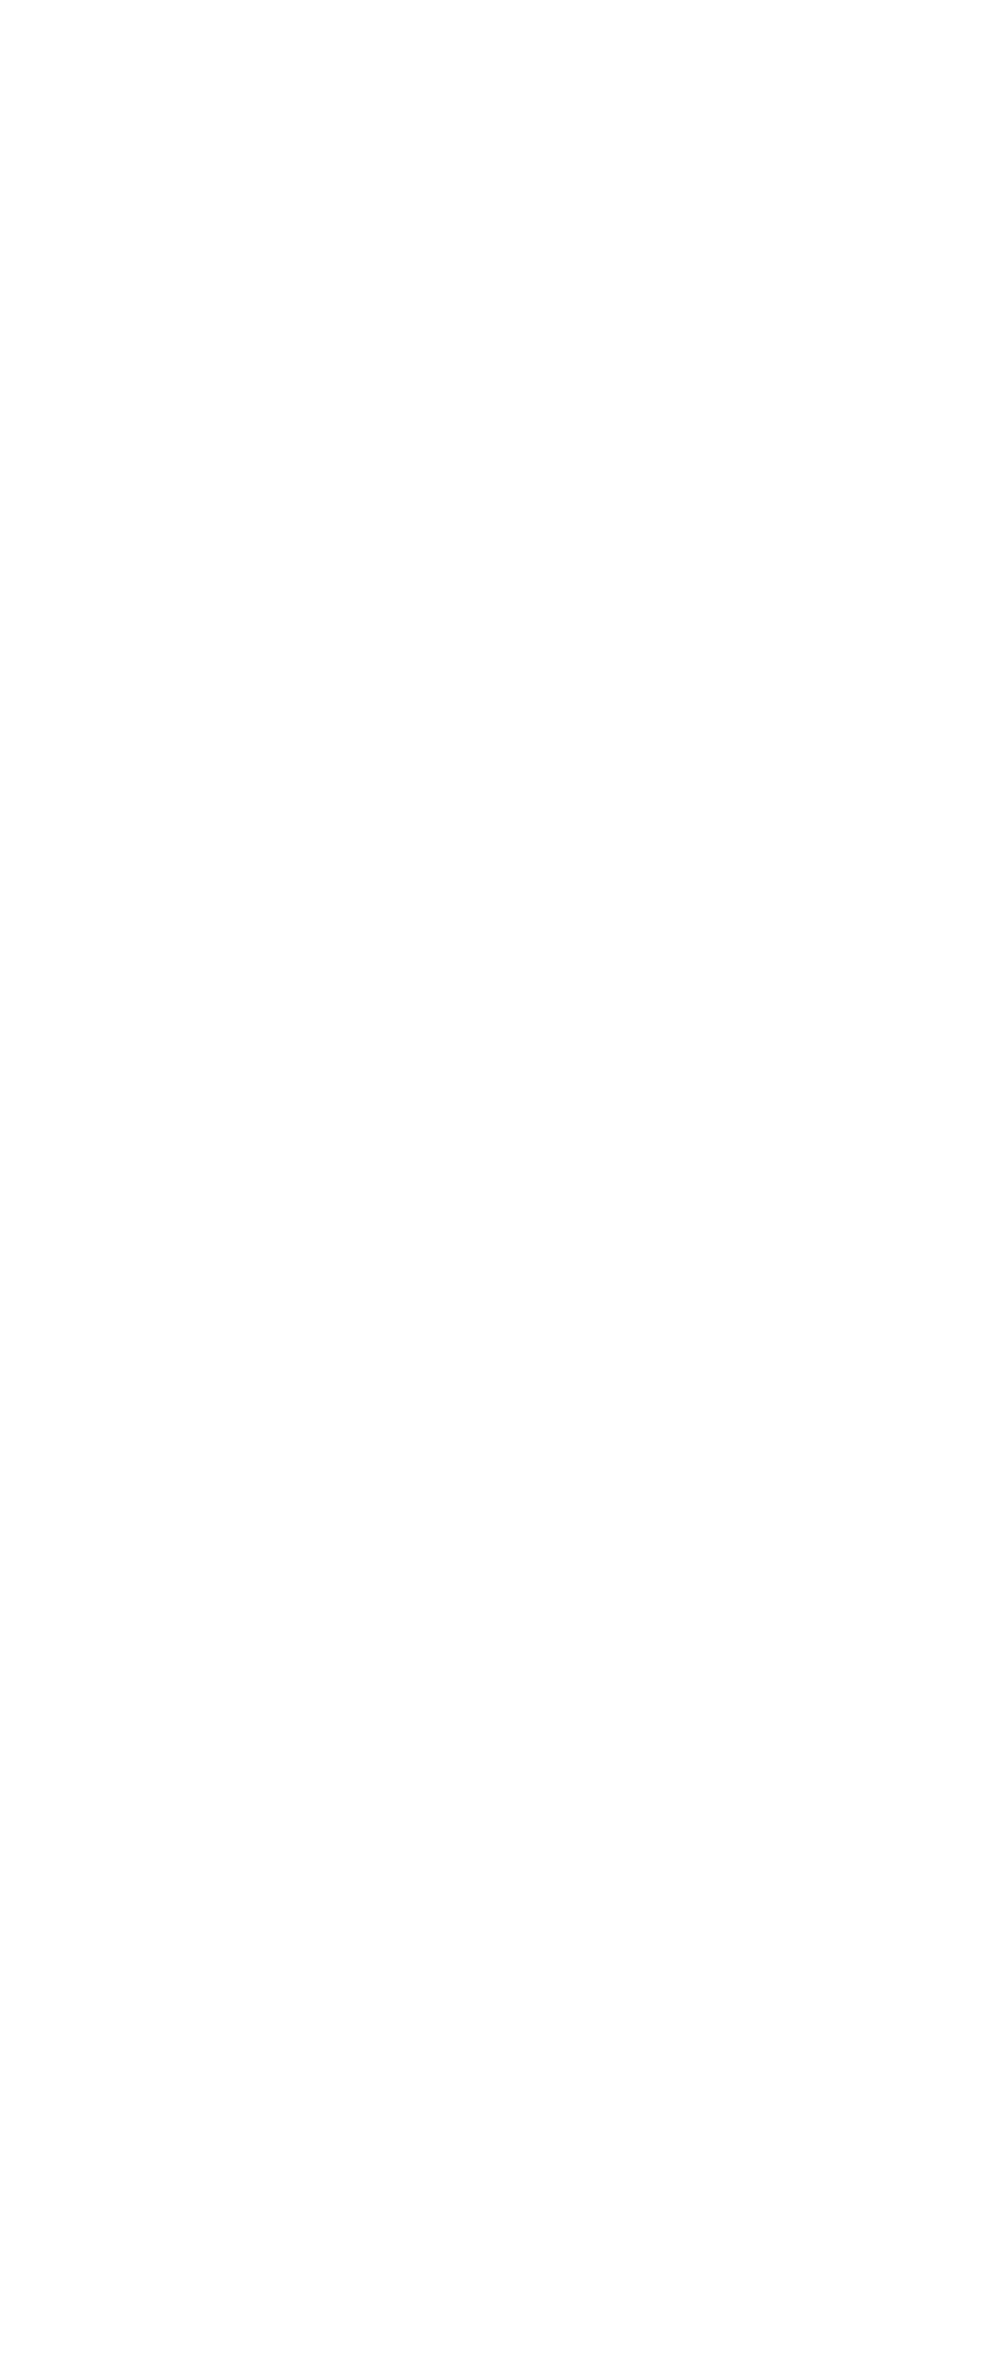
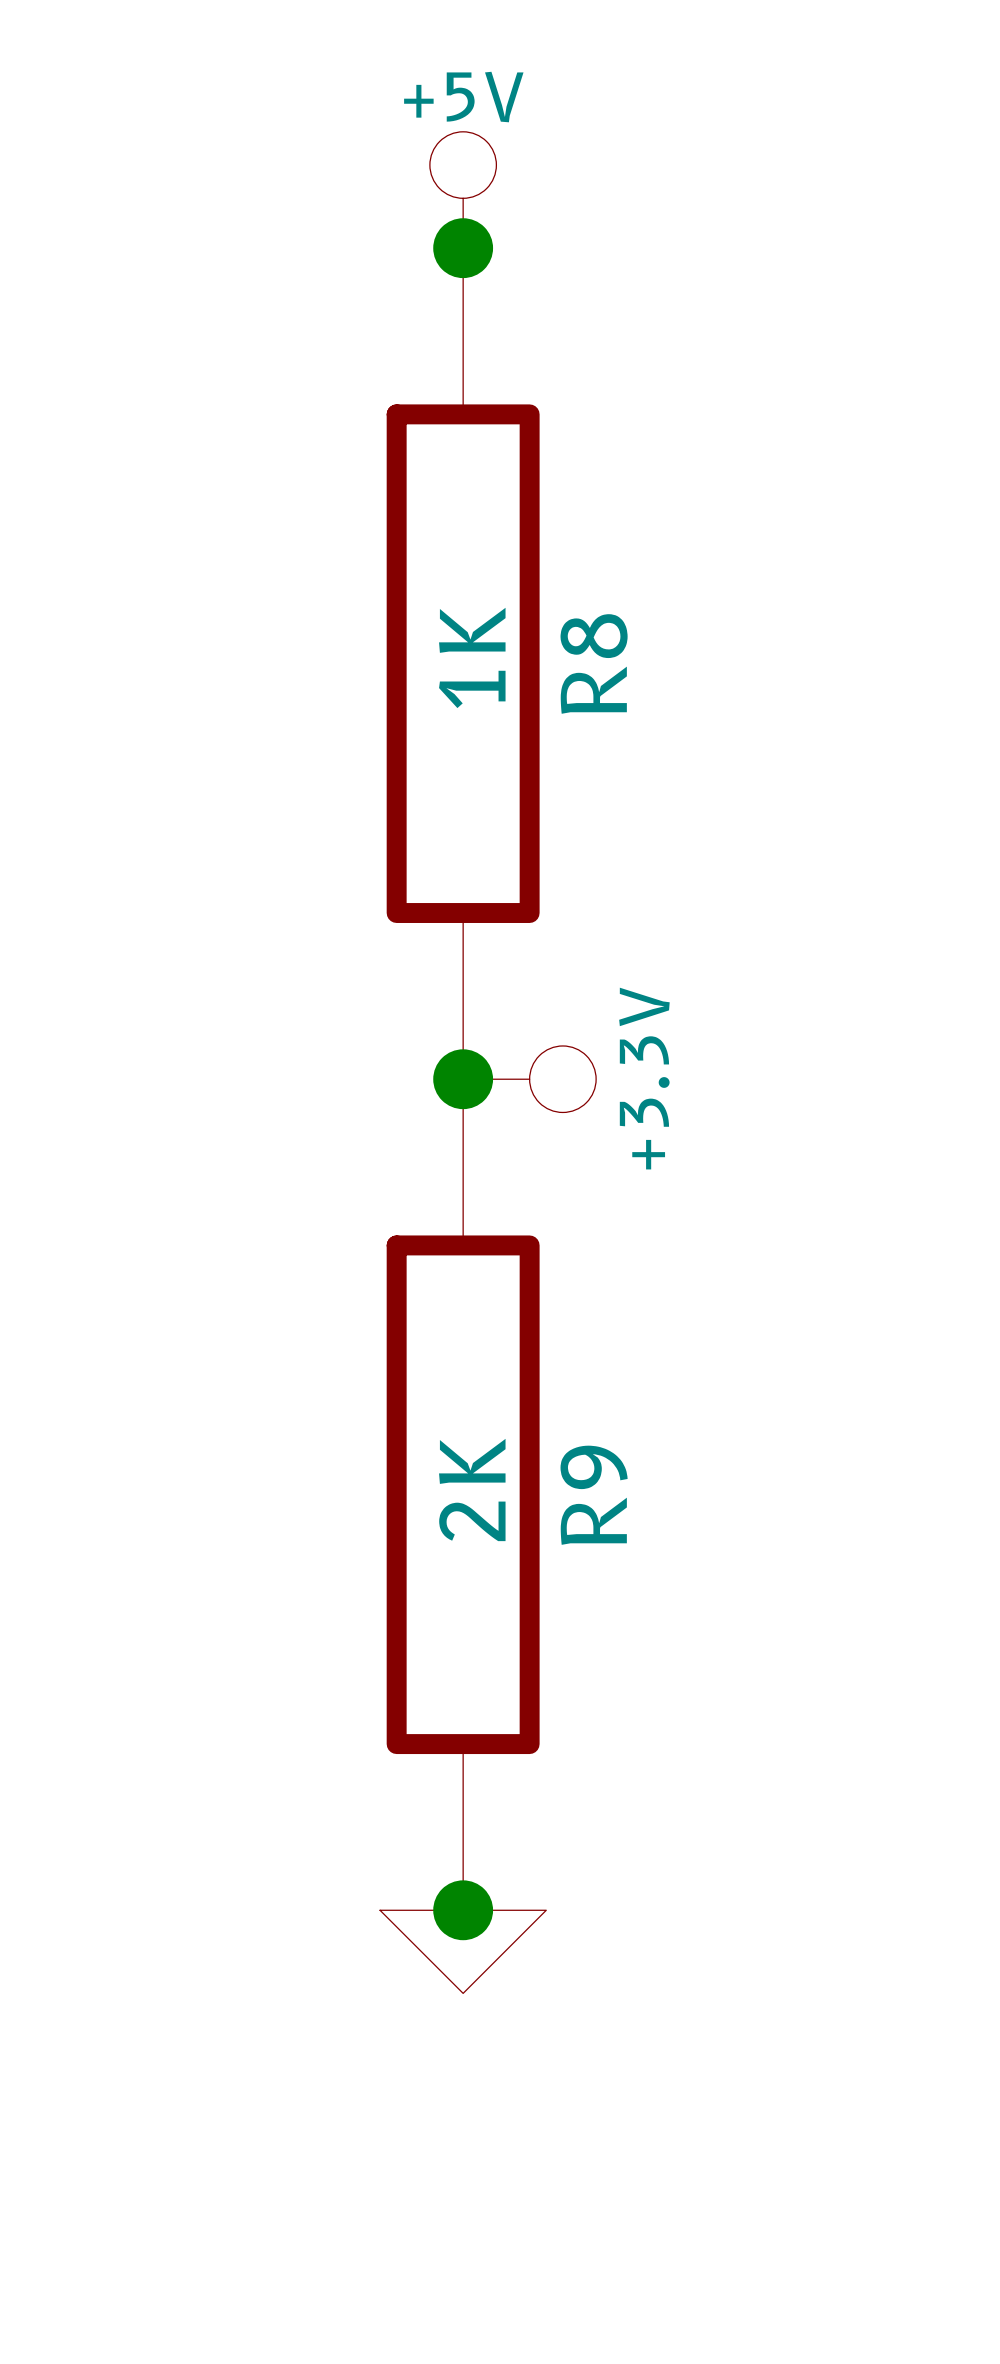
power symbol: none -> +5V (463, 189)
junction: none -> (463, 248)
R8: none -> 1K (463, 663)
junction: none -> (463, 1079)
power symbol: none -> +3.3V (529, 1079)
R9: none -> 2K (463, 1494)
junction: none -> (463, 1910)
power symbol: none -> (463, 1951)

